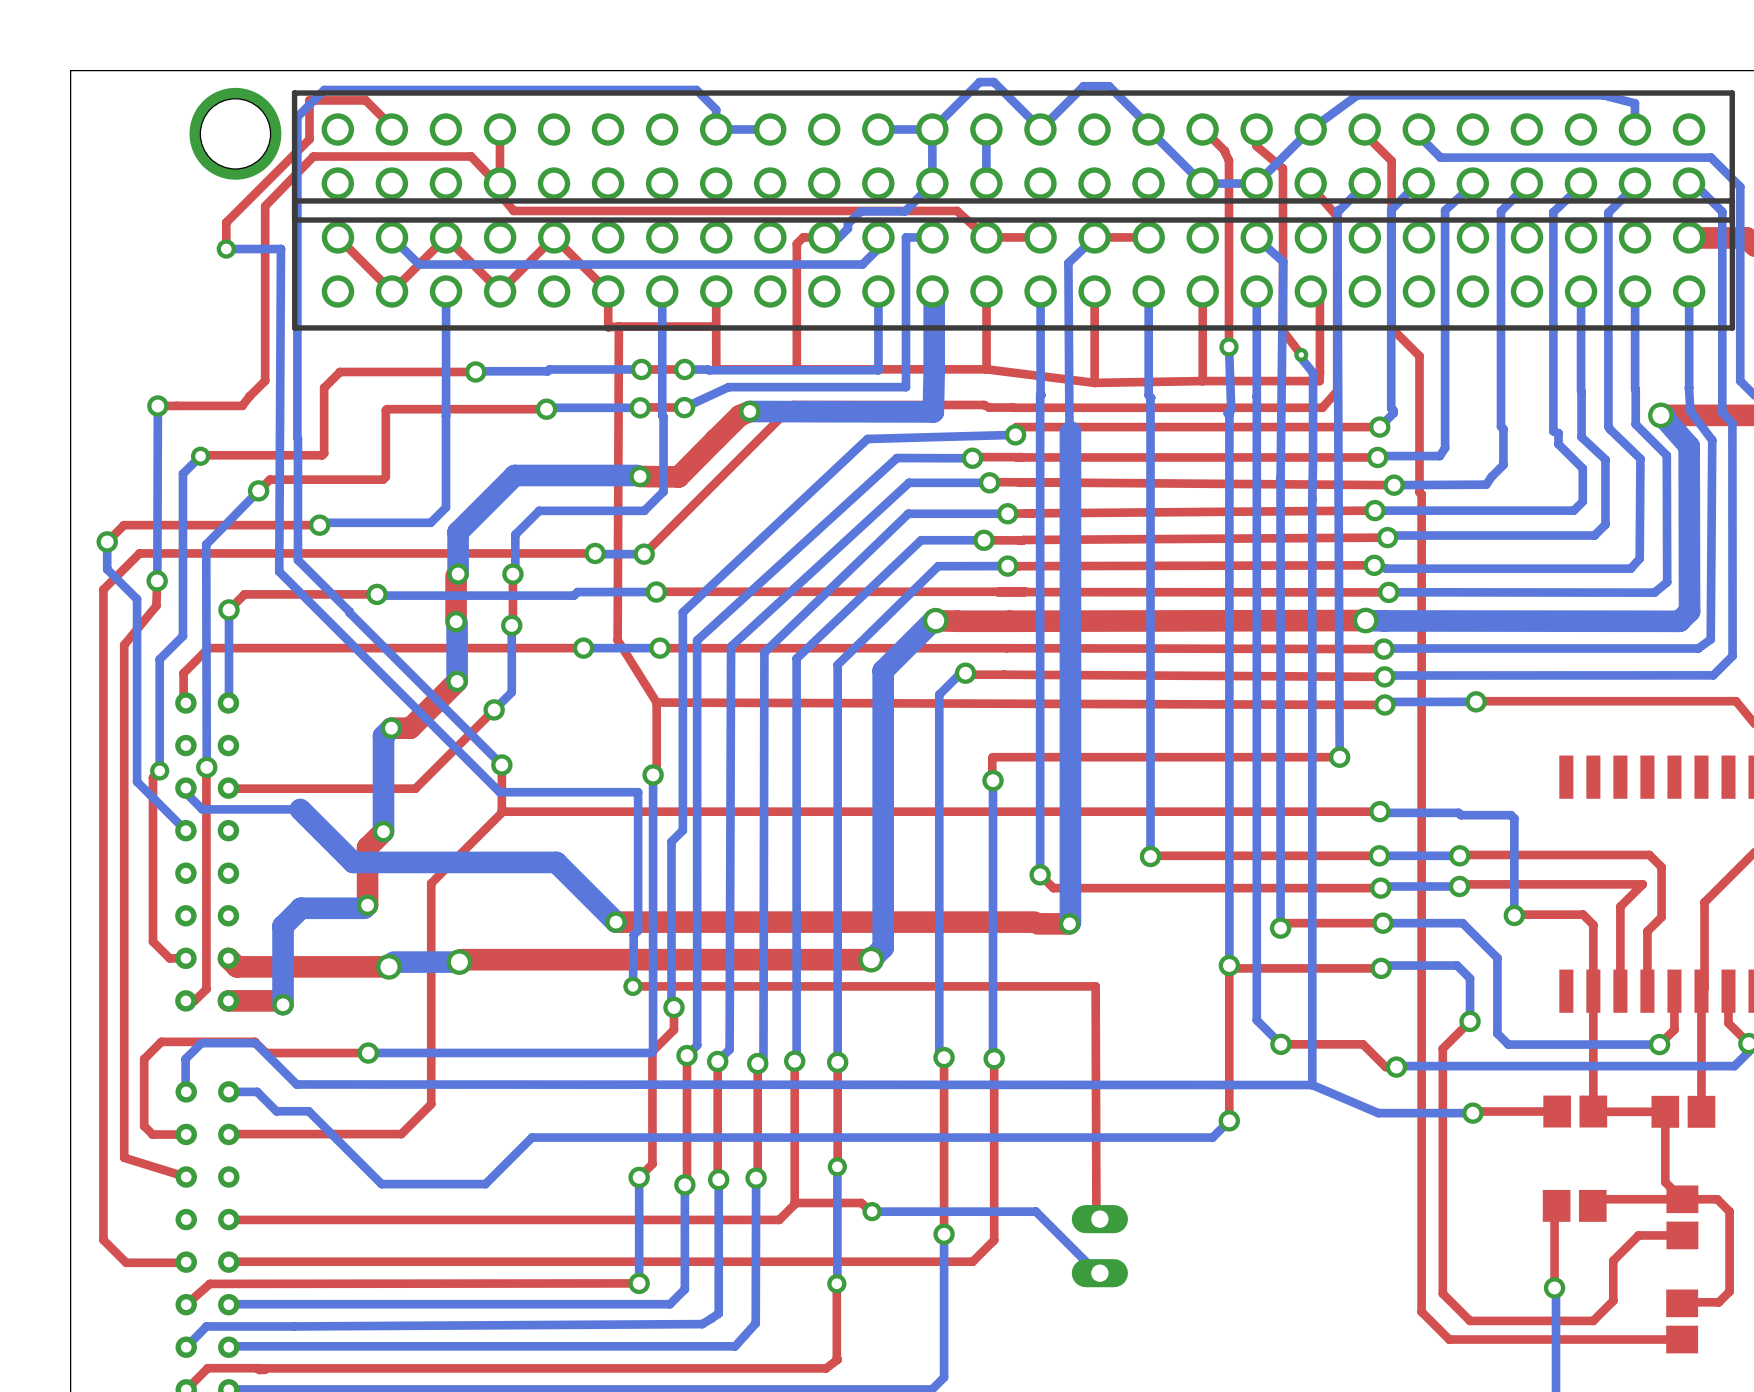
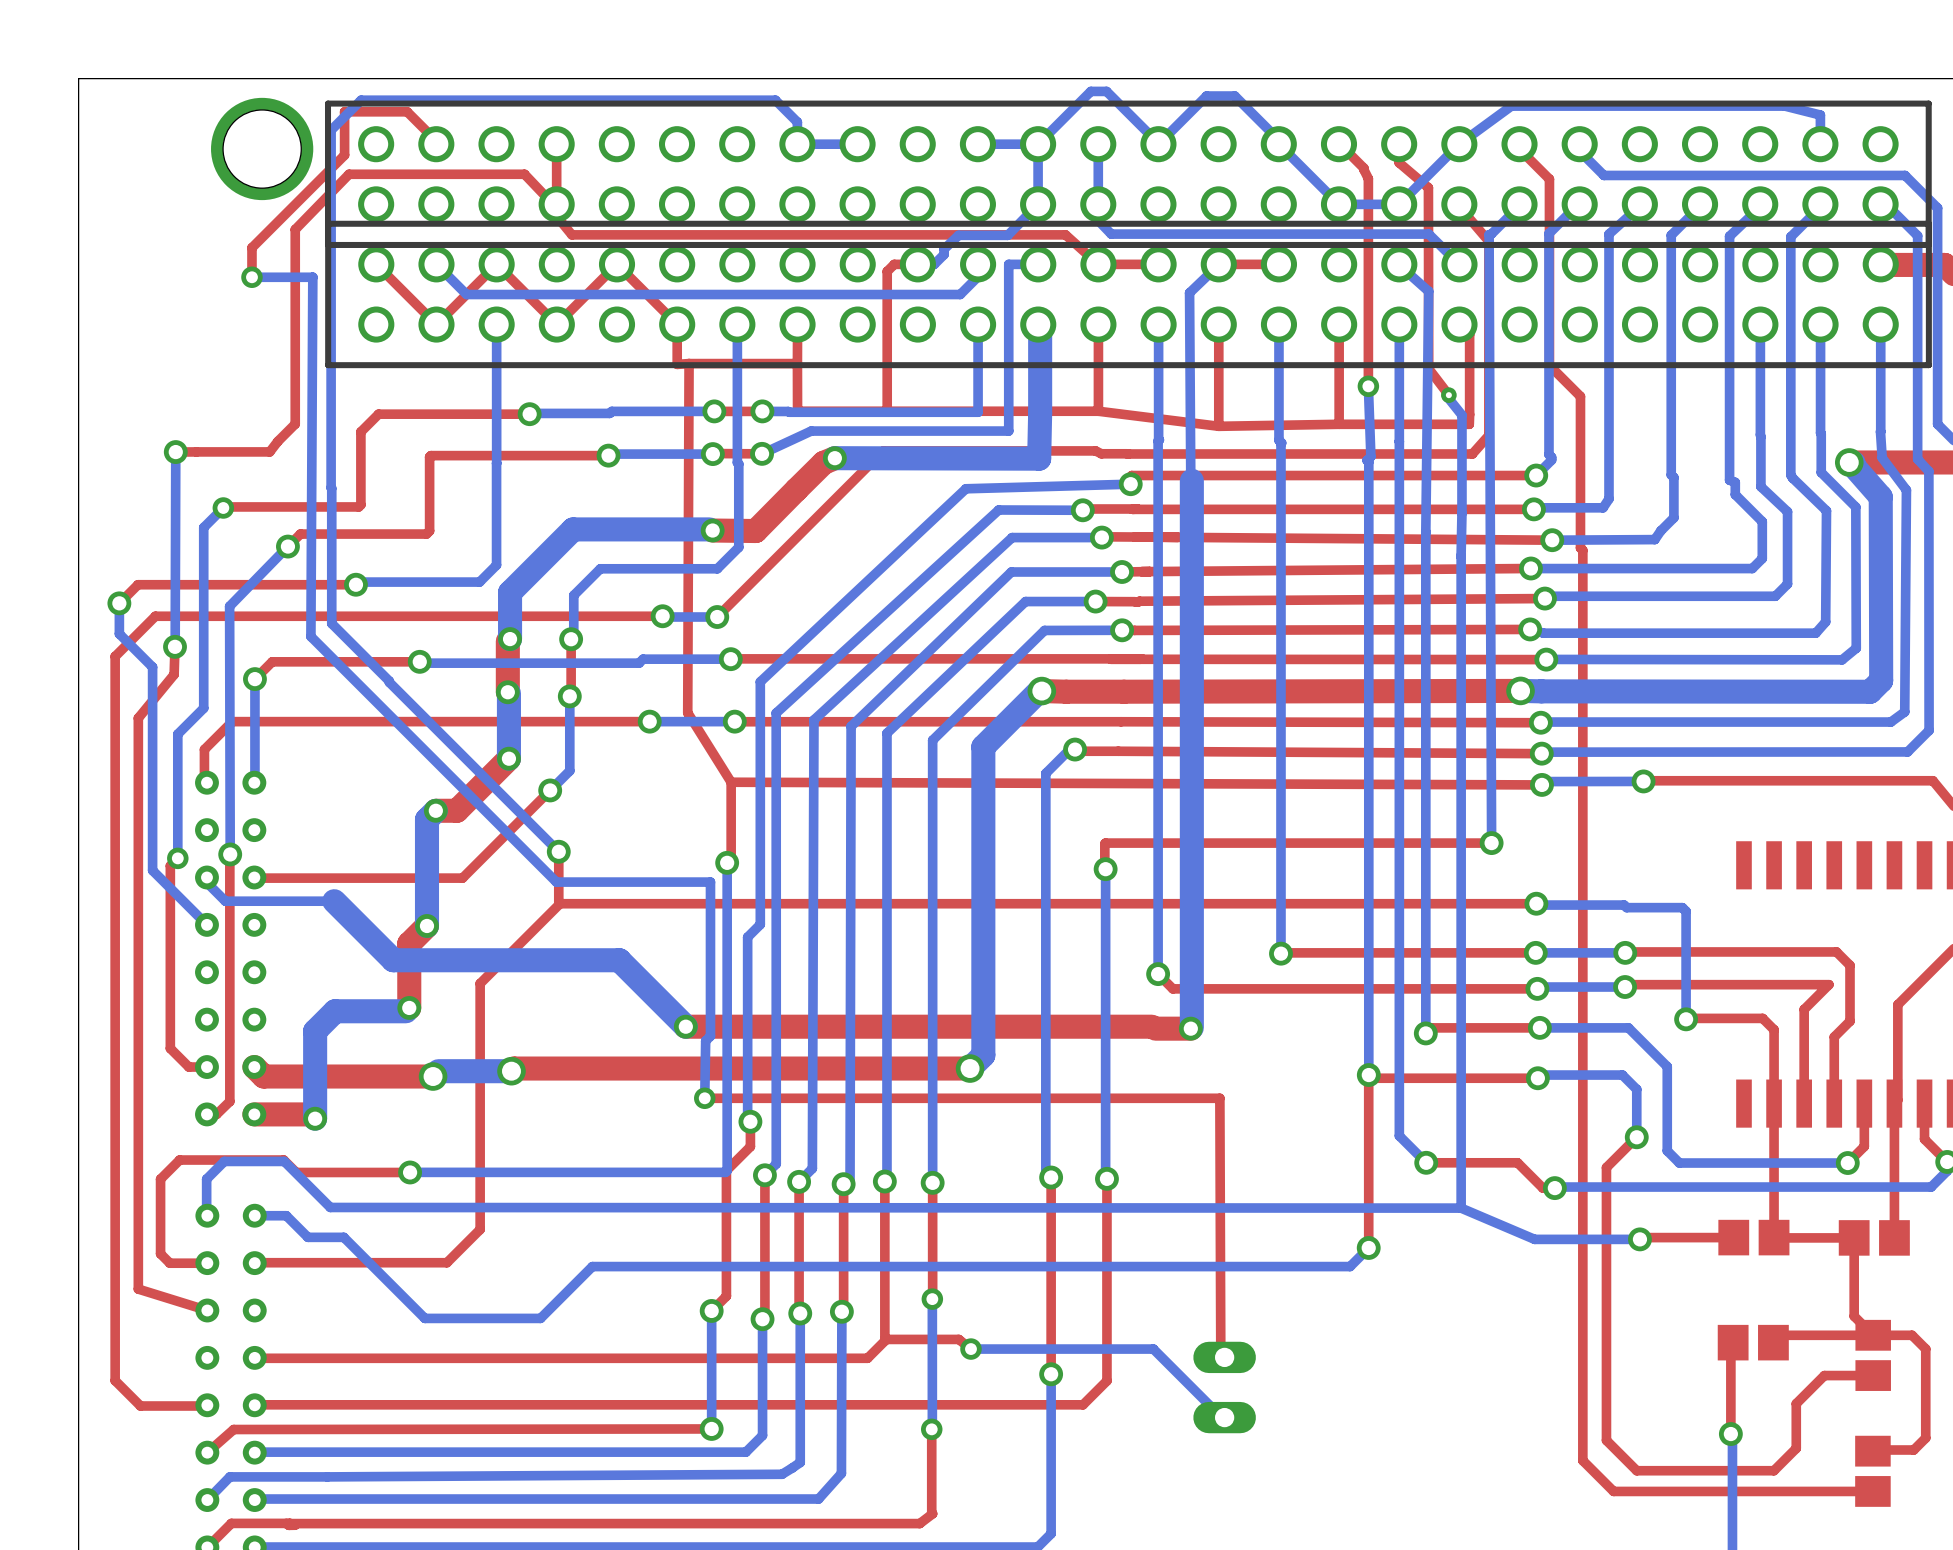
bottom track: none -> (1098, 220) (1111, 234) (1428, 234) (1459, 264)

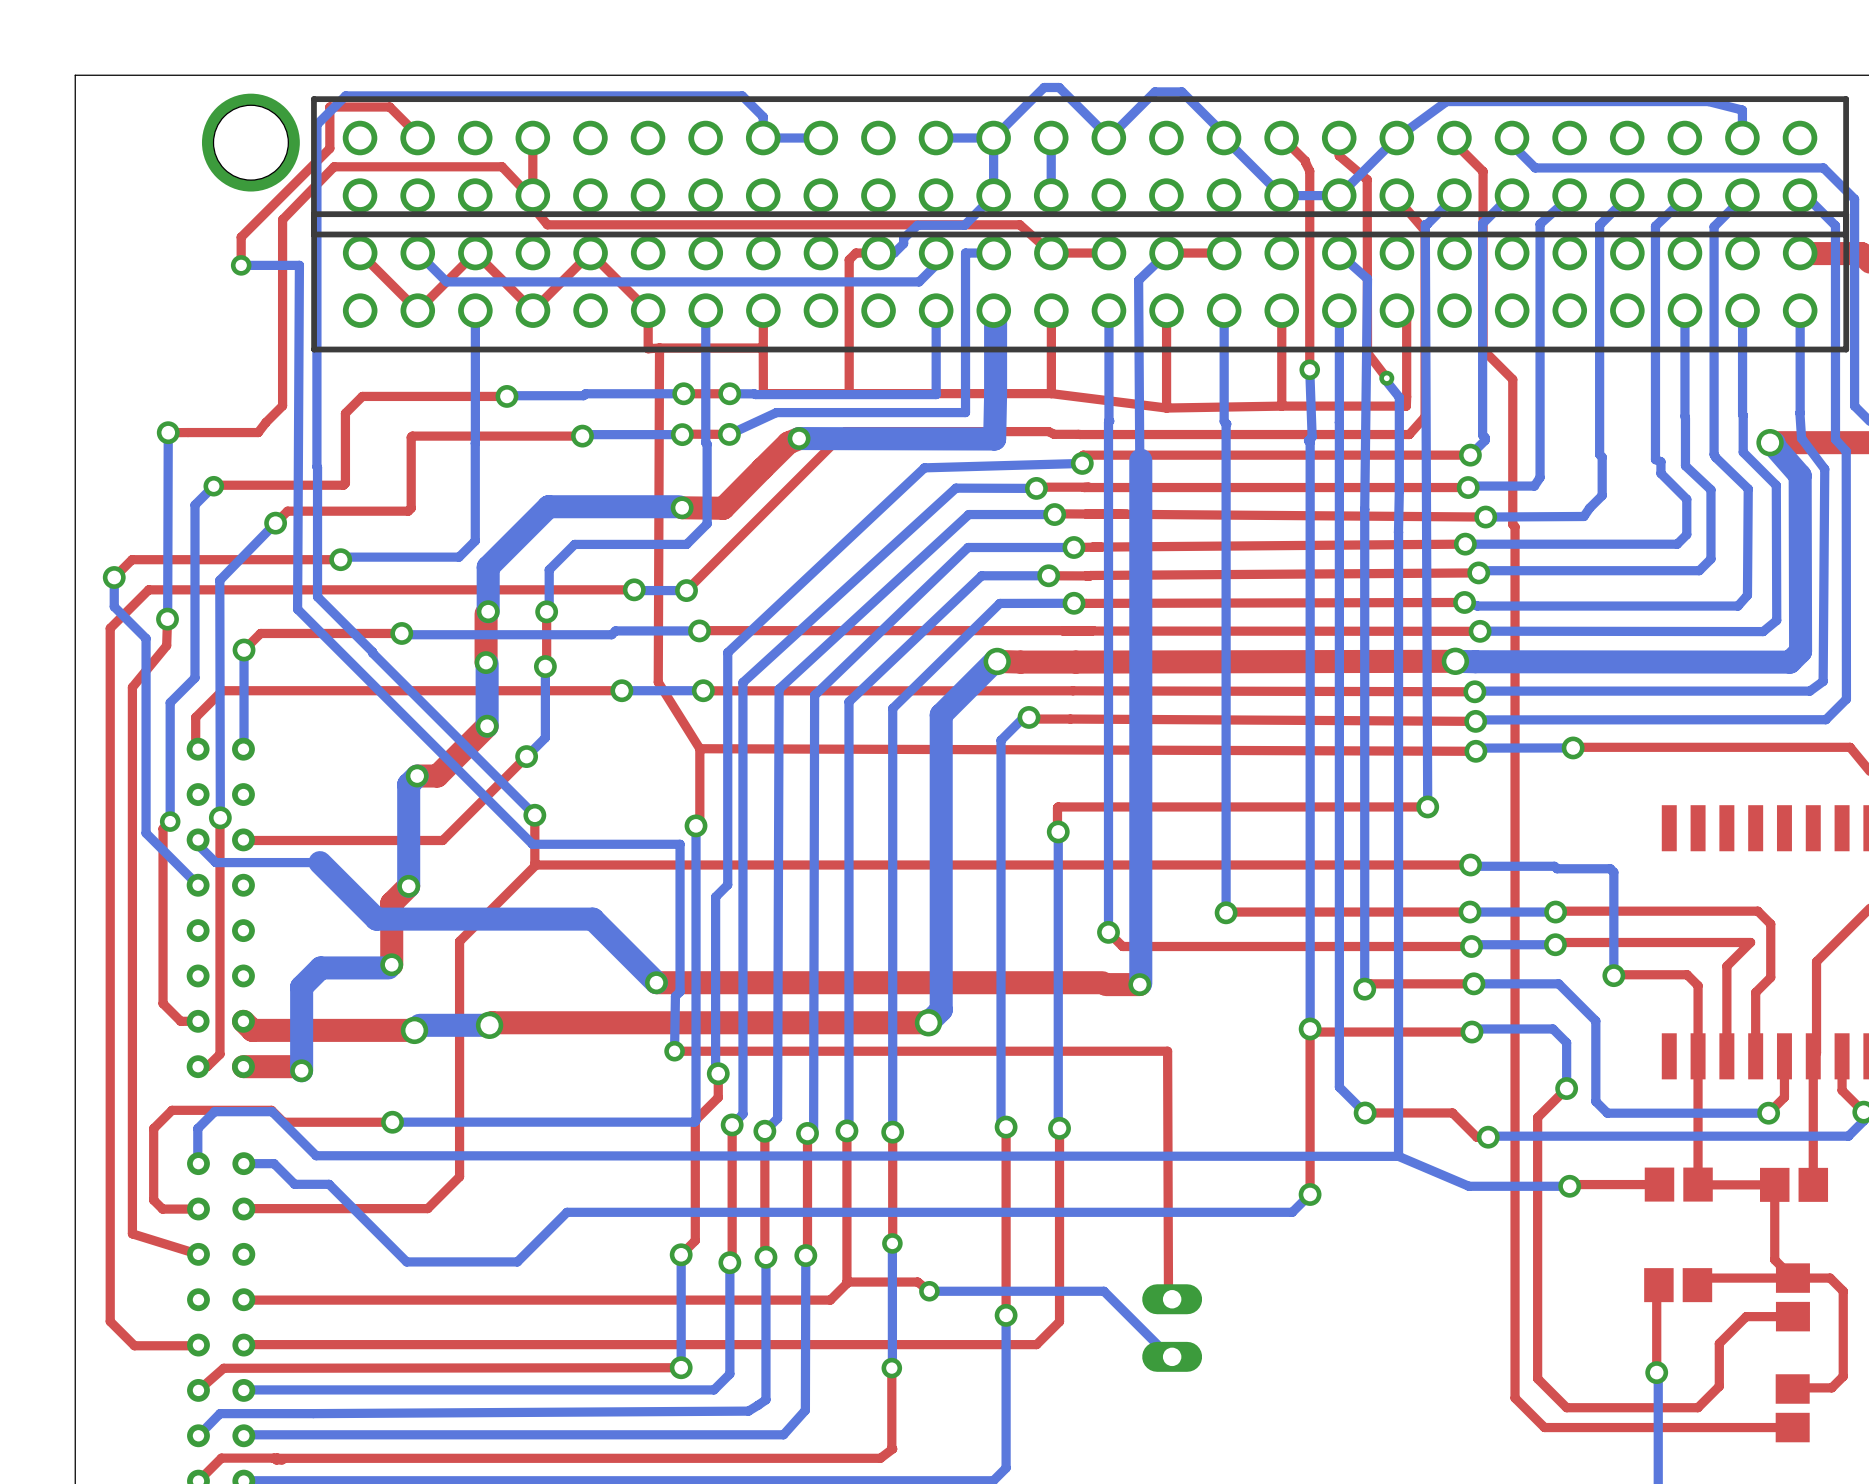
bottom track: (1098, 220) (1111, 234) (1428, 234) (1459, 264) -> none

